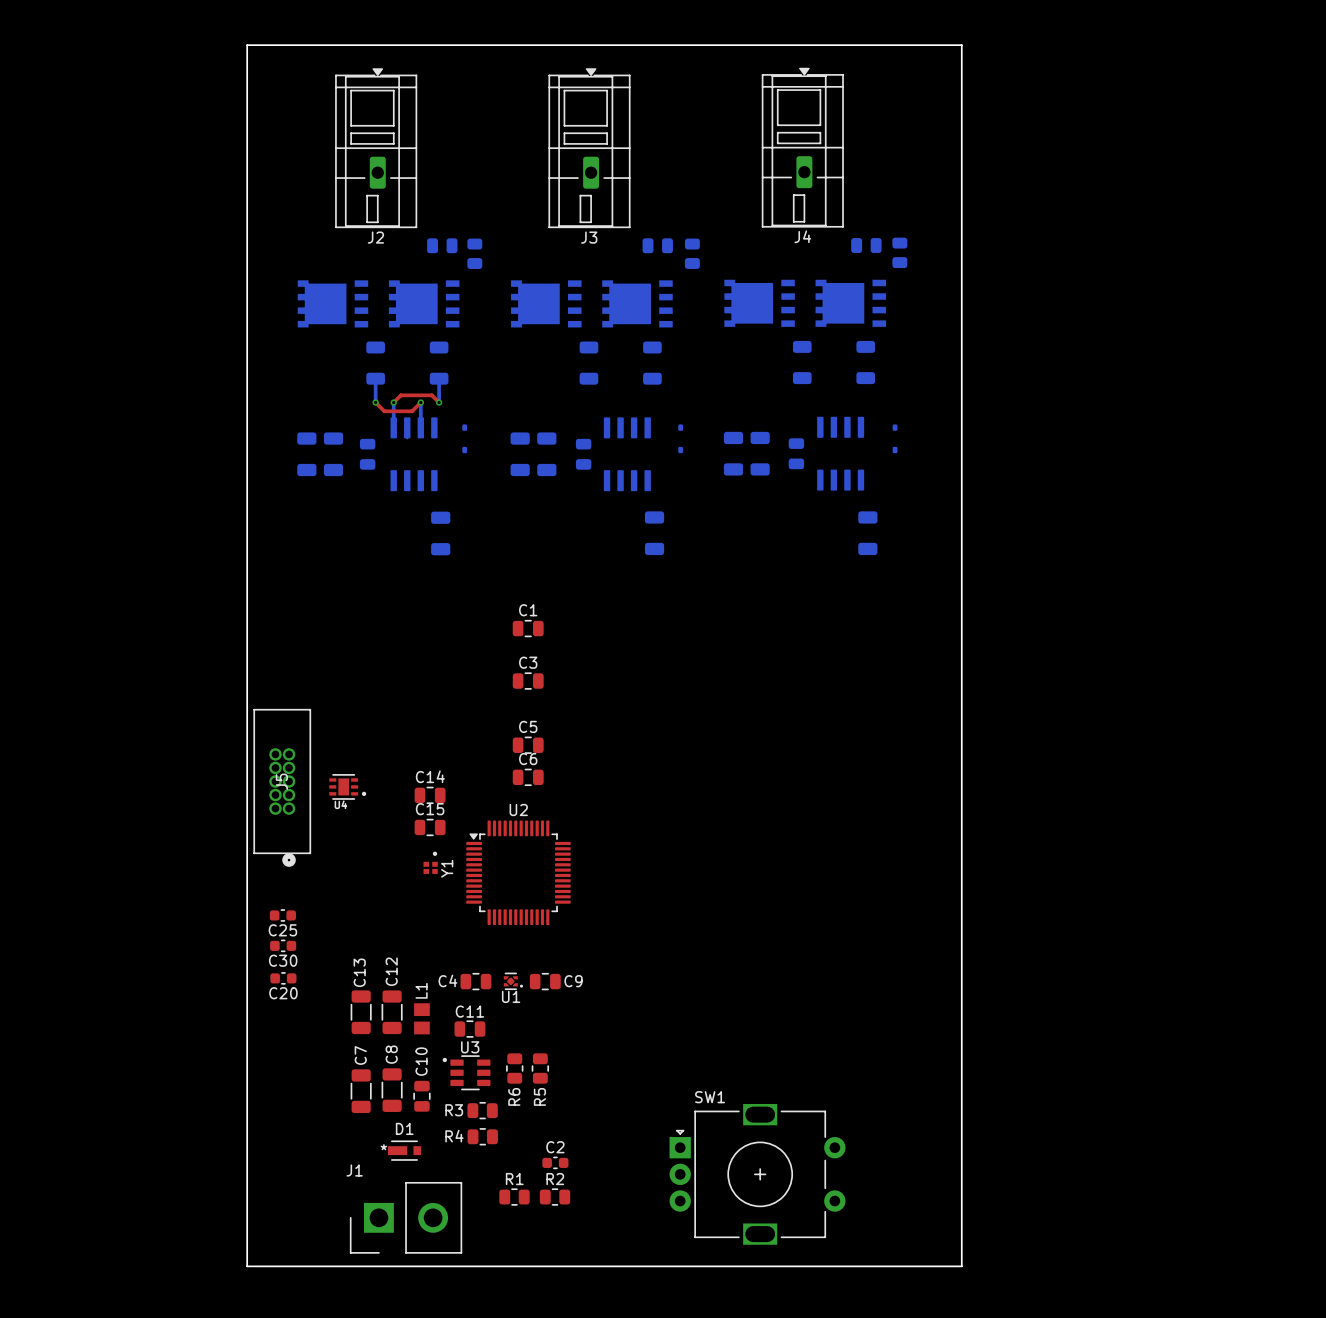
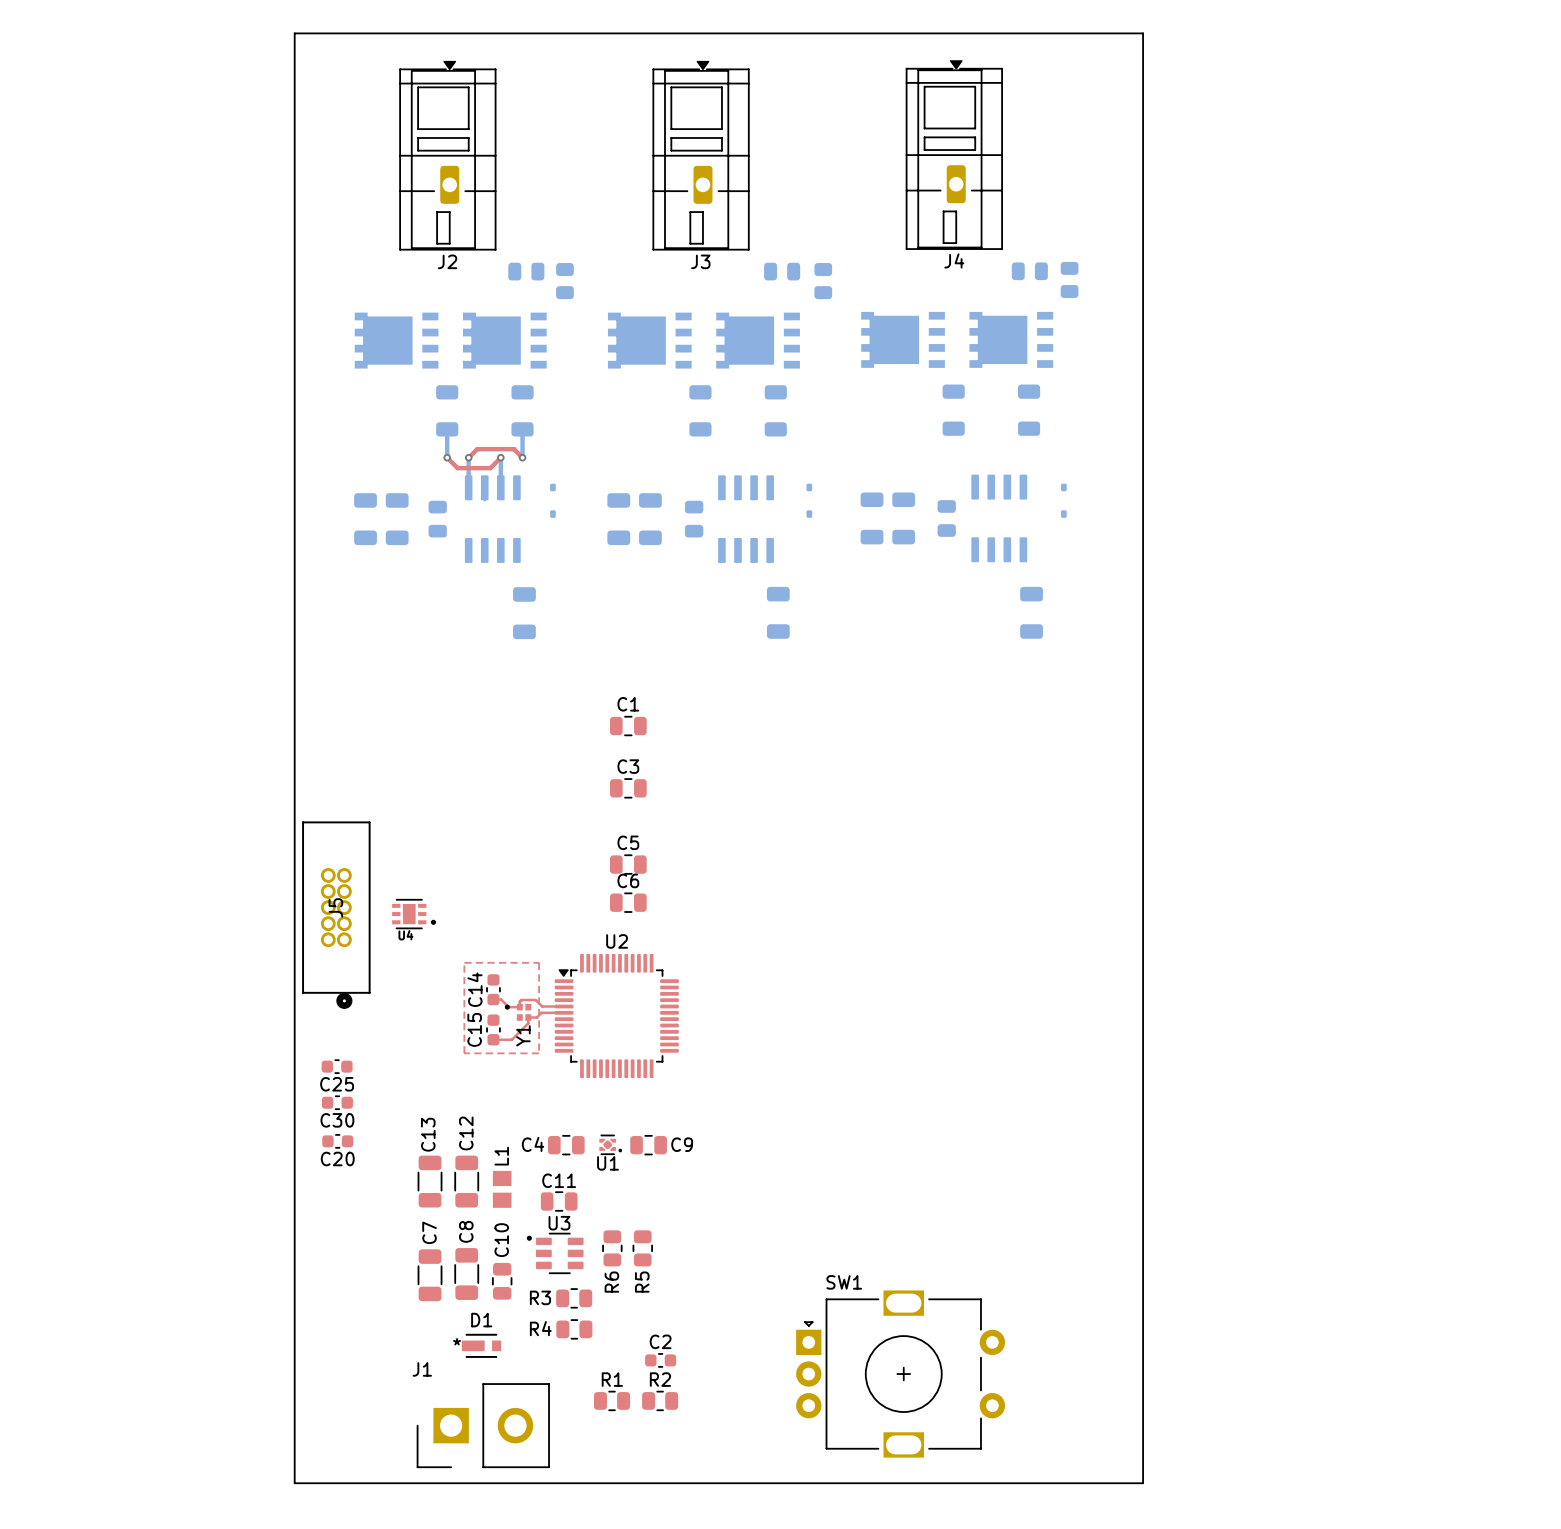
C14 name position: C14 (430, 776) -> C14 (474, 989)
C14 footprint: [414, 786, 446, 804] -> [486, 974, 501, 1006]
C15 name position: C15 (430, 809) -> C15 (474, 1029)
C15 footprint: [414, 818, 446, 836] -> [486, 1014, 501, 1046]
top zone outline: none -> (464, 962) (539, 962) (539, 1053) (464, 1053) (464, 962)
top track: none -> (493, 999) (501, 999) (508, 1007) (519, 1007) (521, 1000) (535, 1000) (542, 1006) (564, 1006)
Y1 rotation: 0° (430, 862) -> 90° counterclockwise (518, 1012)
top track: none -> (564, 1012) (541, 1012) (536, 1017) (528, 1017) (528, 1023) (511, 1039) (493, 1039)

